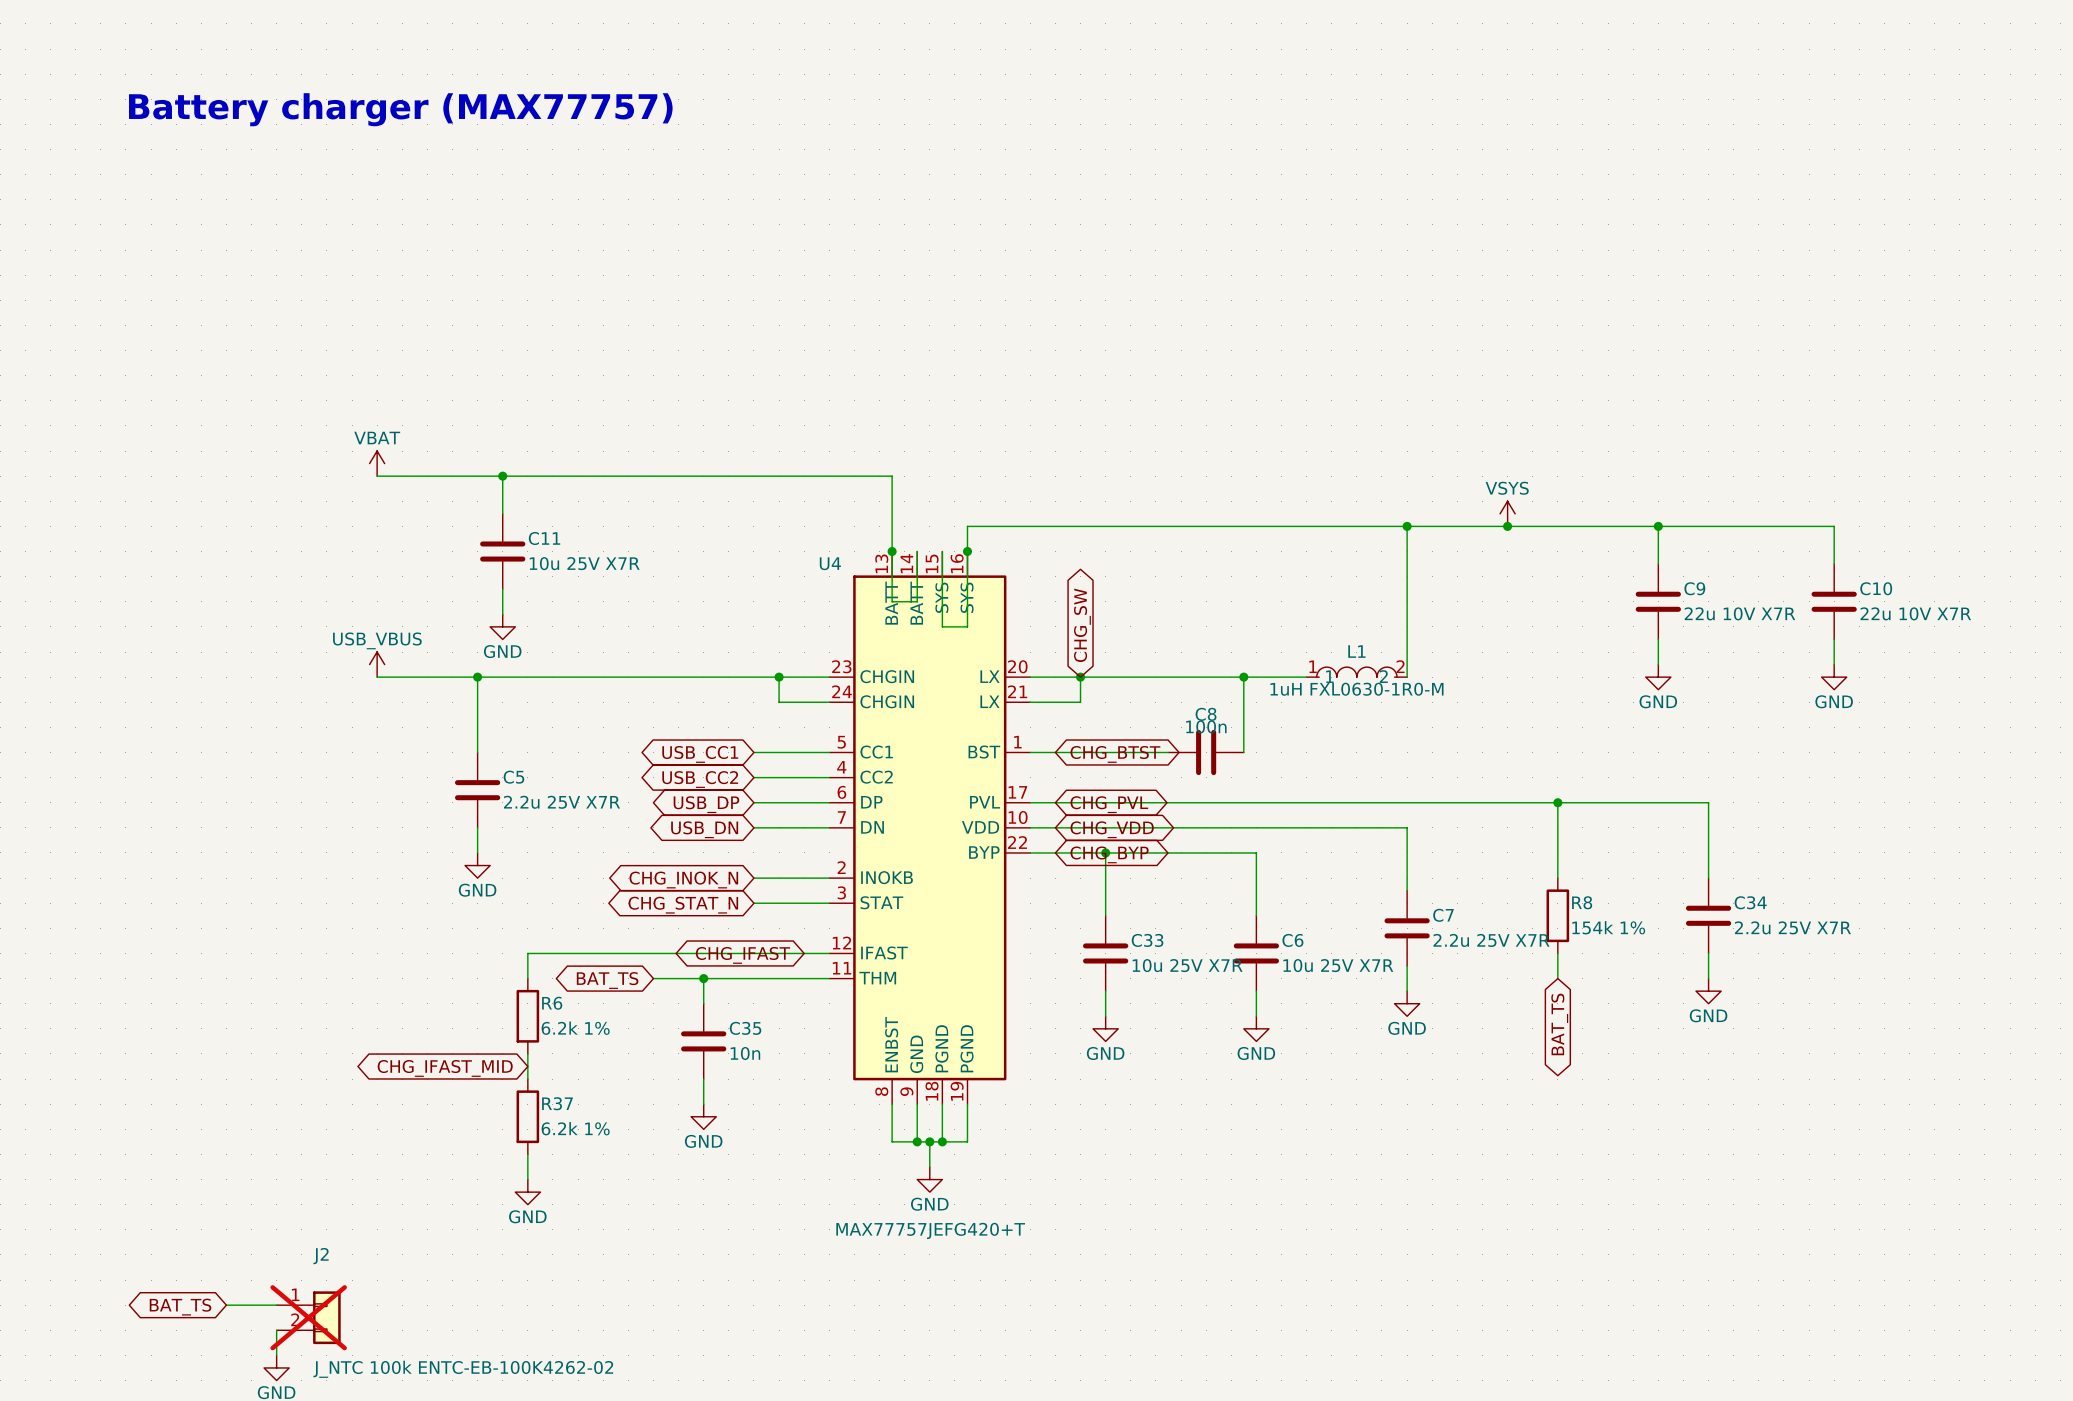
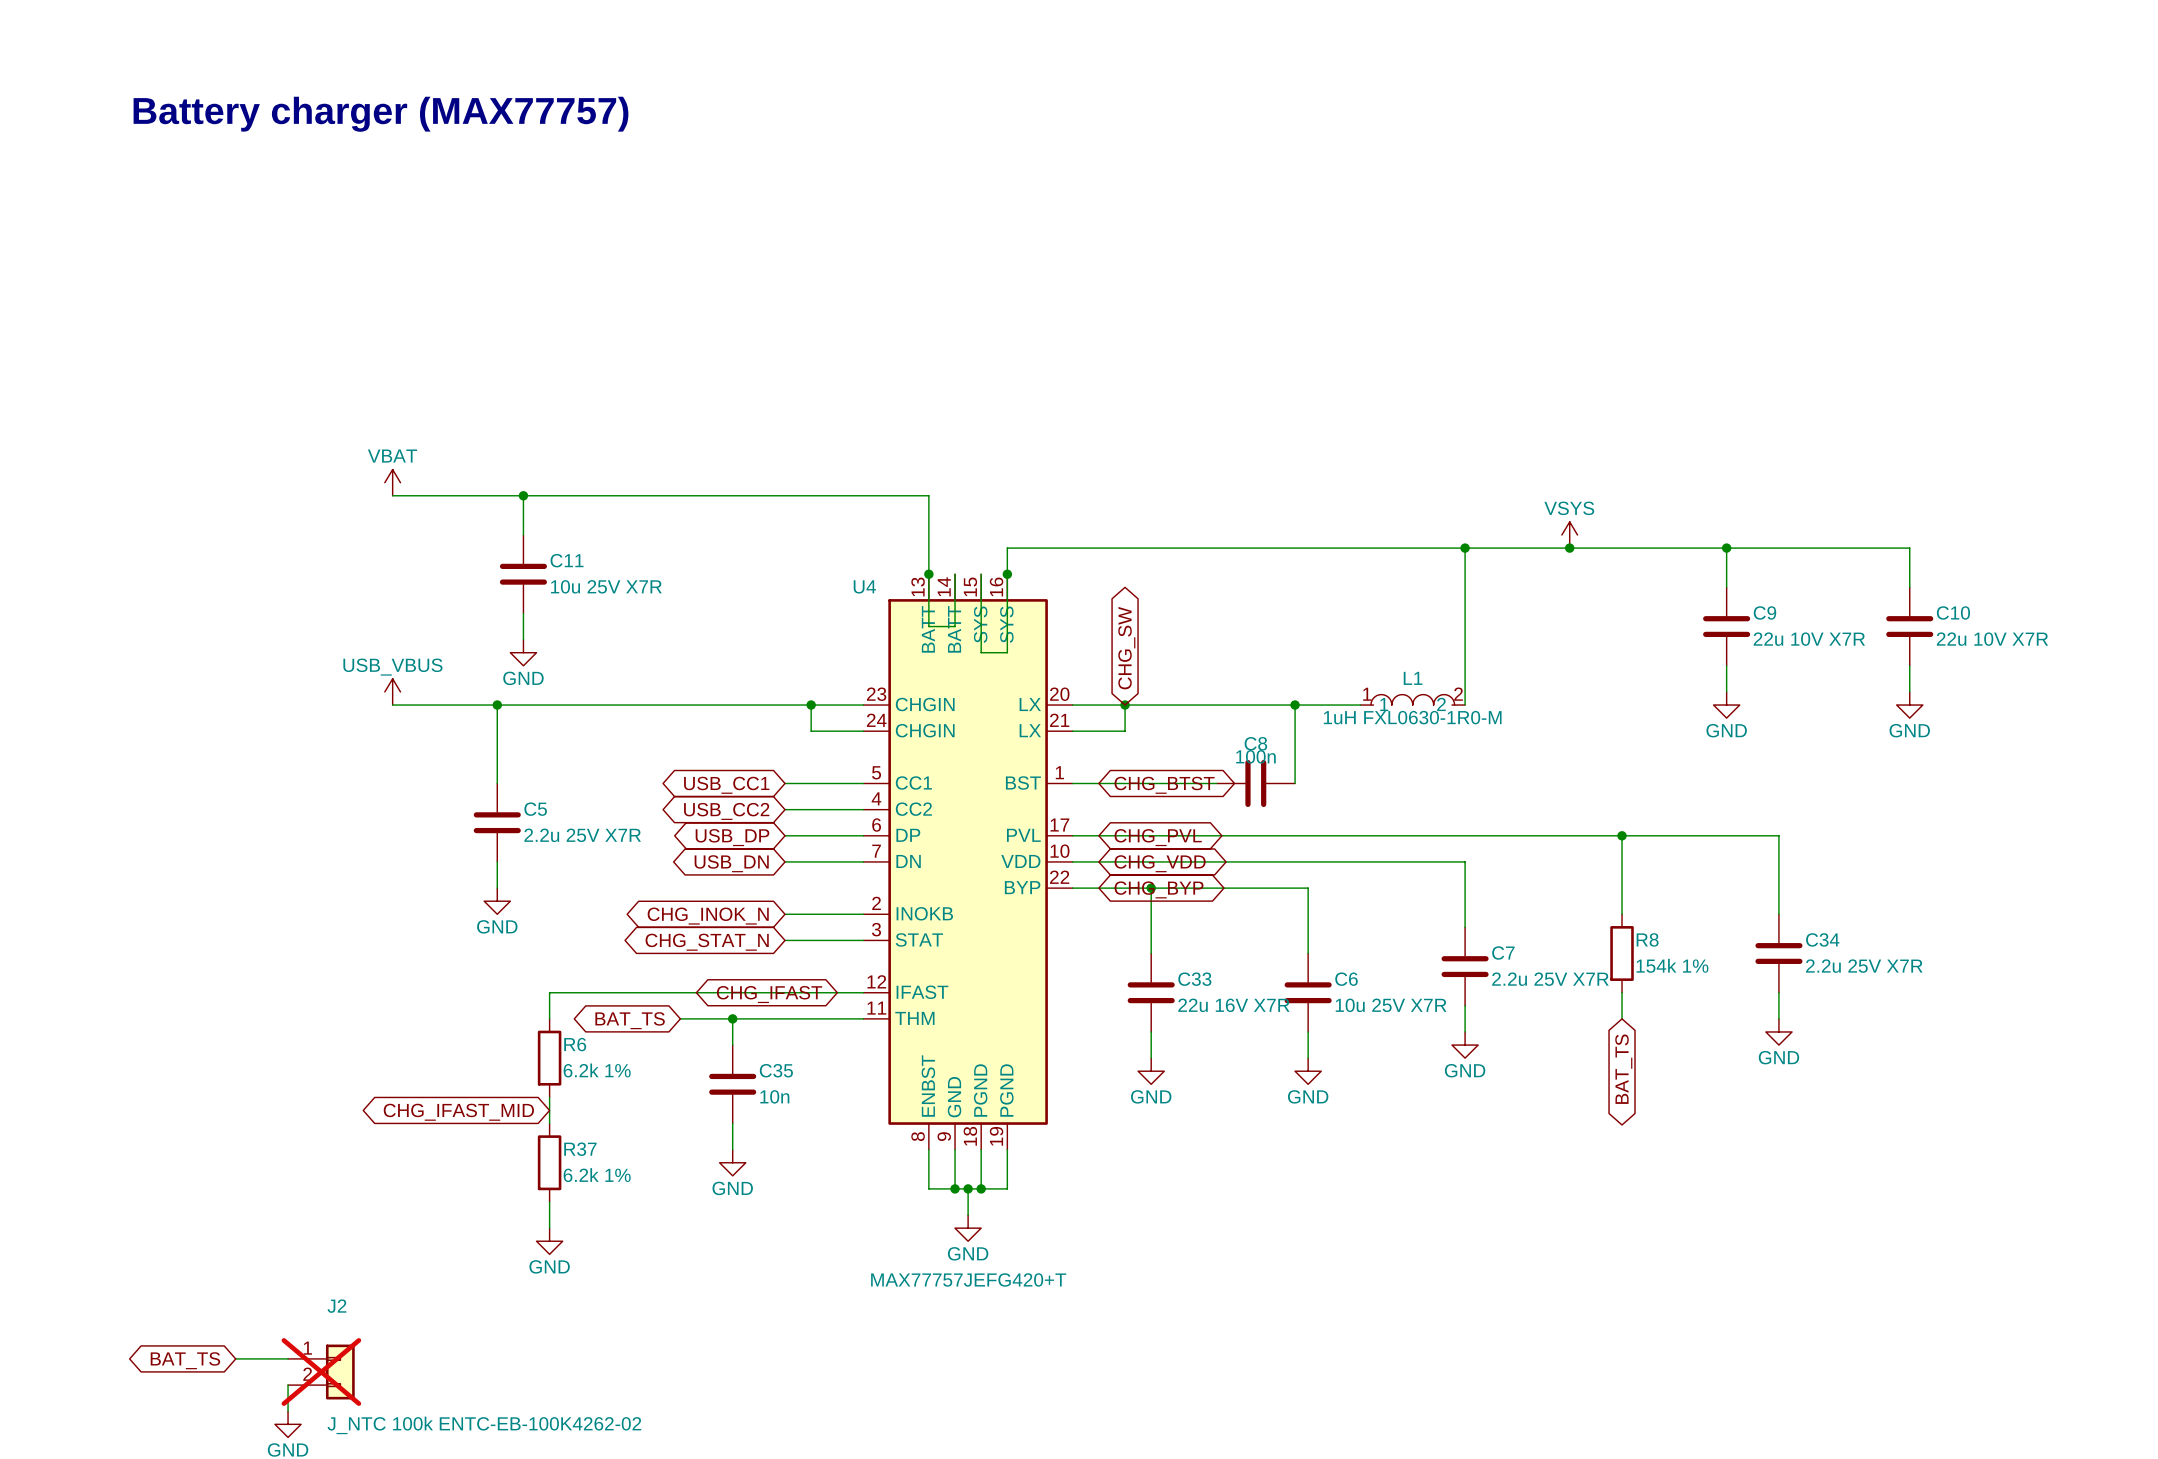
C33 value: 10u 25V X7R (1187, 965) -> 22u 16V X7R (1233, 1005)

